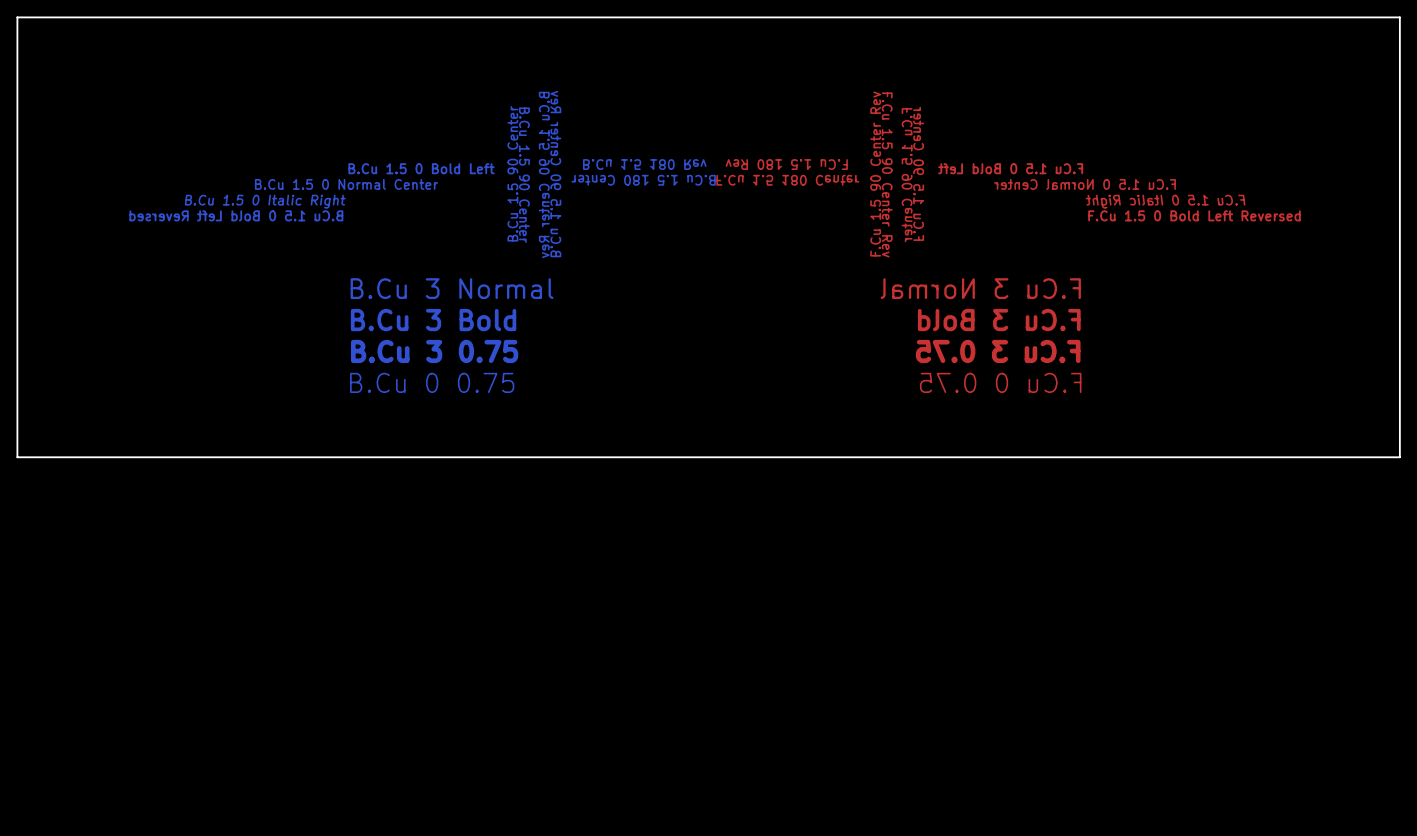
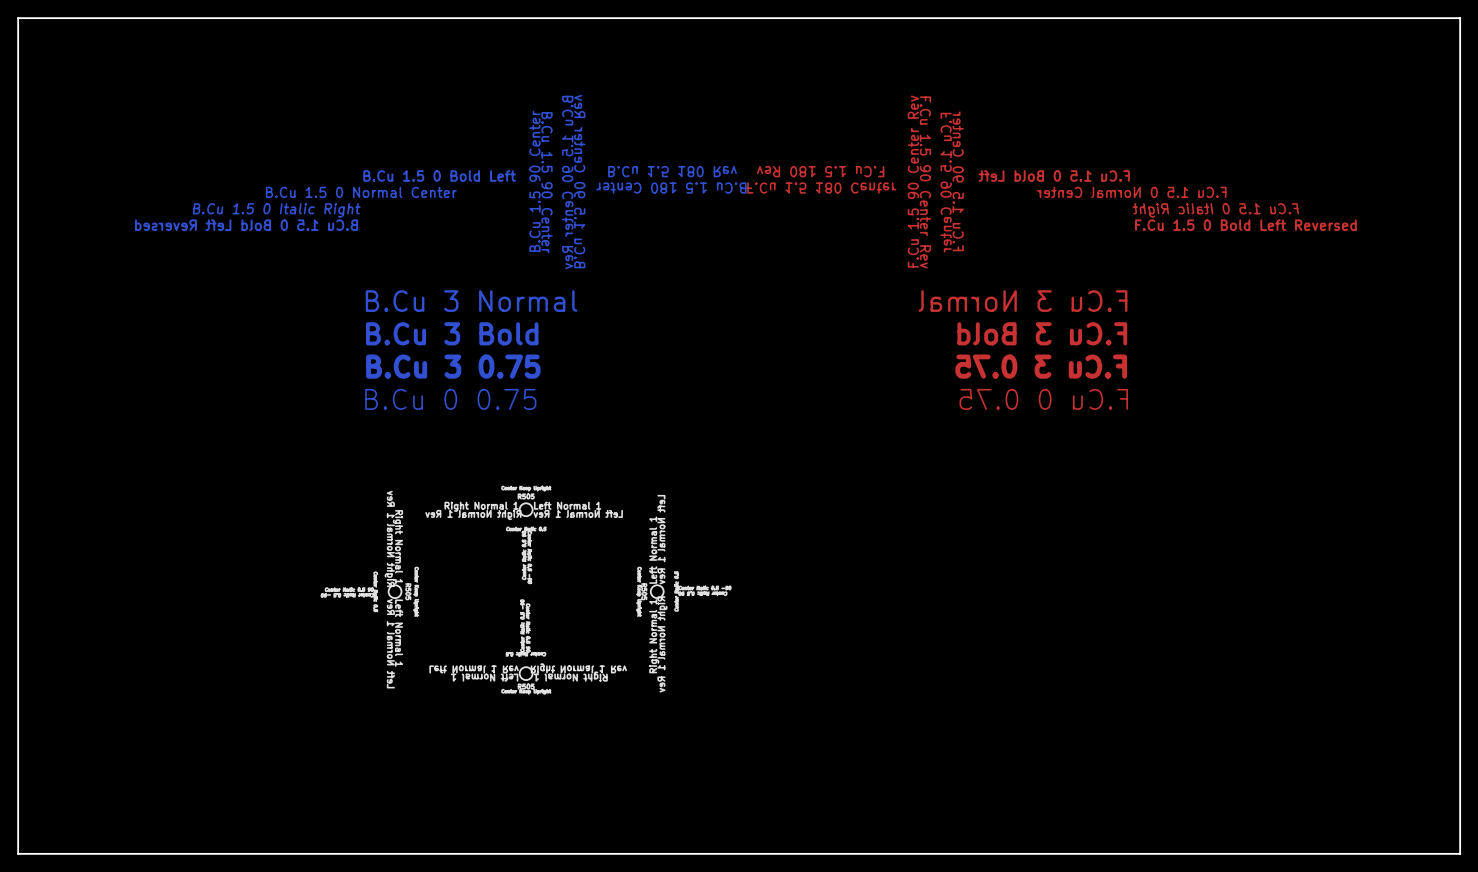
board edge: (1399, 457) (17, 457) -> (1460, 476) (1460, 853) (18, 853) (18, 476)
part: none -> (526, 509)
part: none -> (395, 591)
part: none -> (657, 591)
part: none -> (526, 673)

